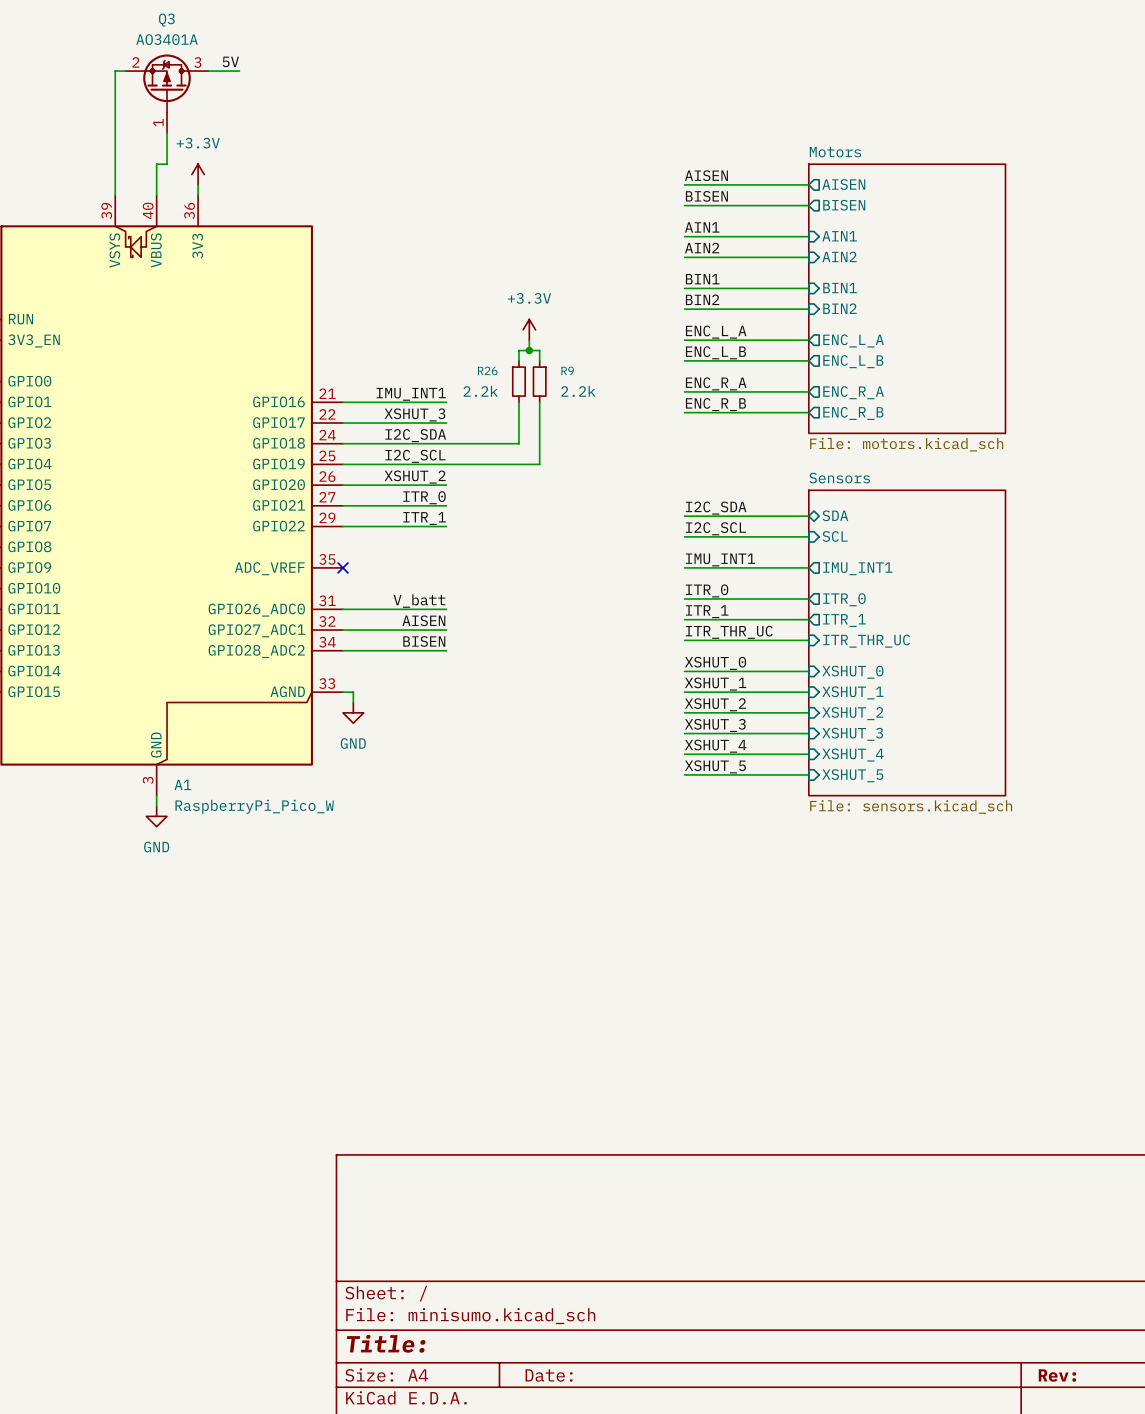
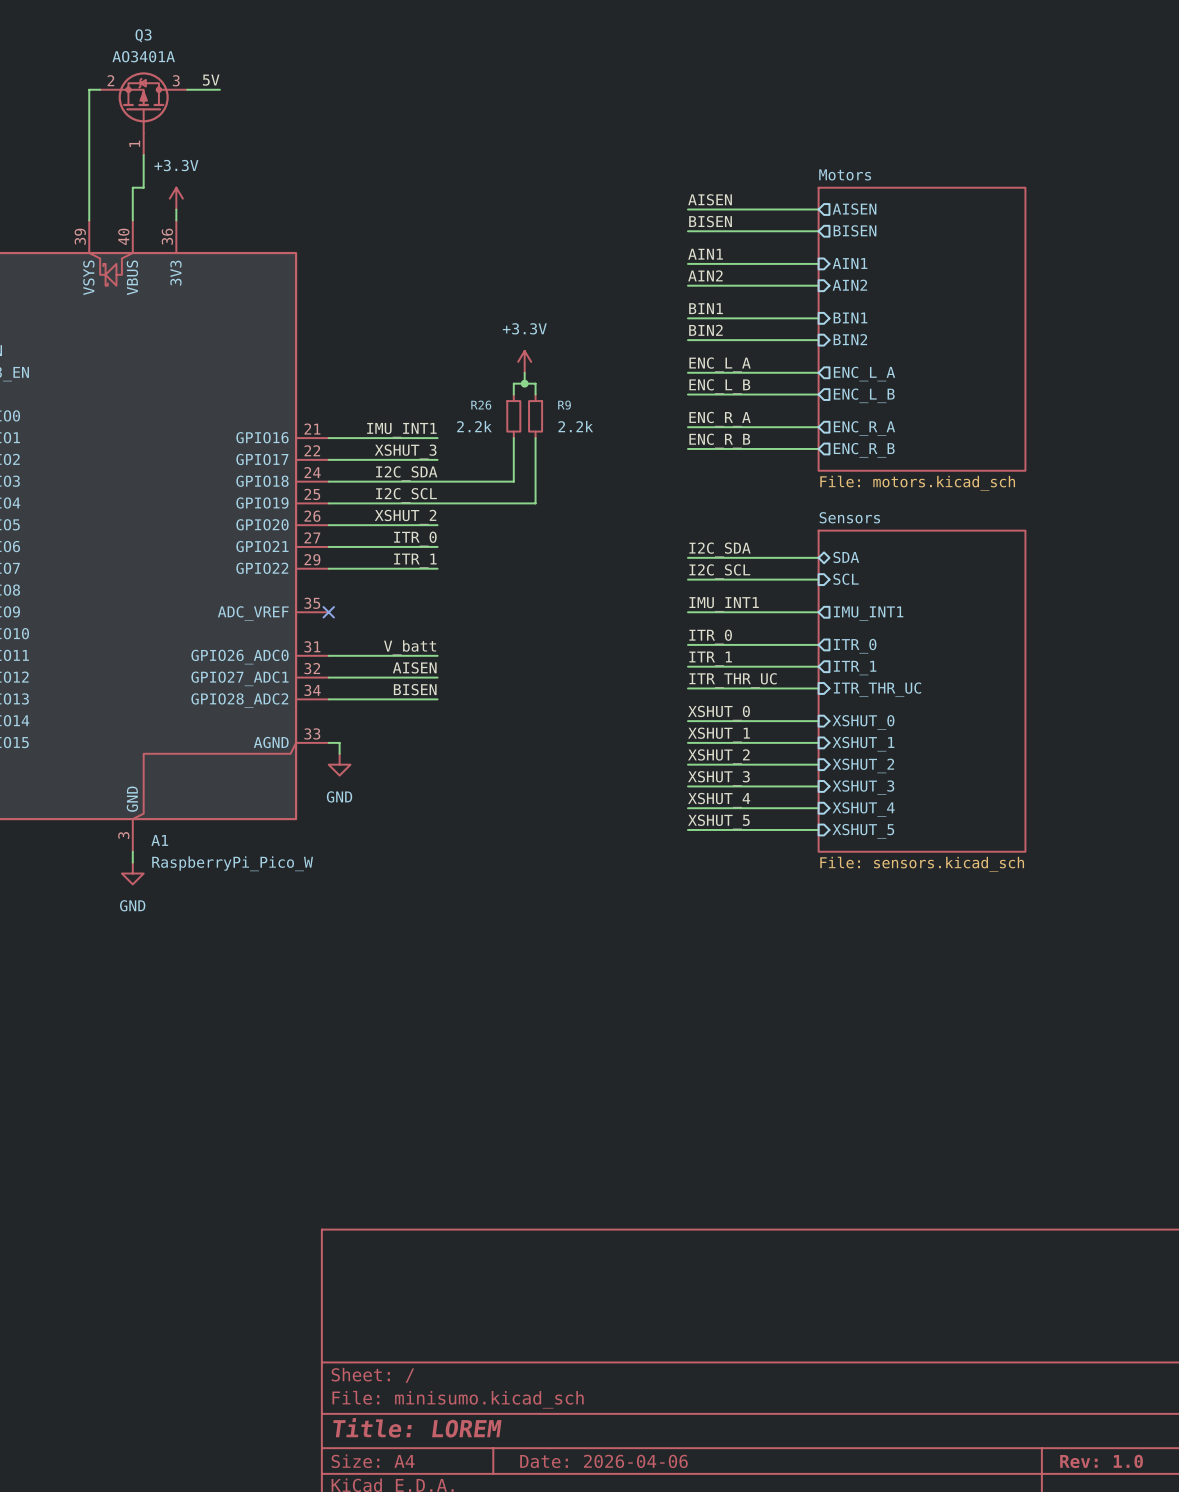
title block: Title: (386, 1343) -> Title: LOREM (417, 1427)
title block: Date: (549, 1375) -> Date: 2026-04-06 (603, 1461)
title block: Rev: (1057, 1375) -> Rev: 1.0 (1101, 1461)

